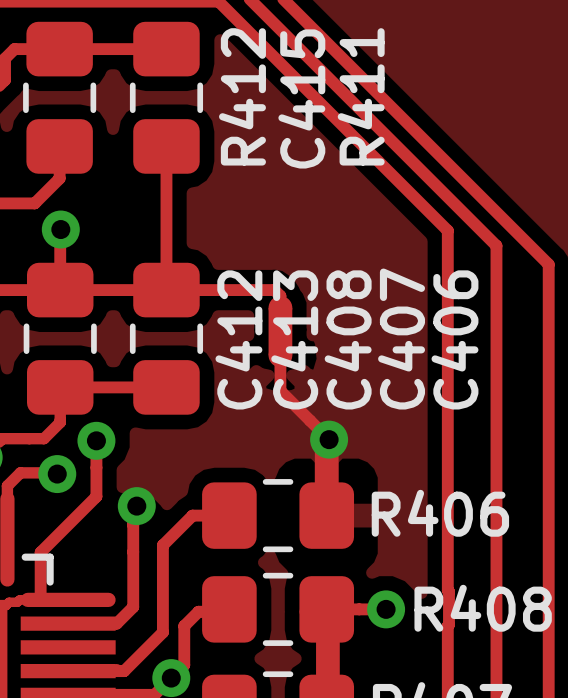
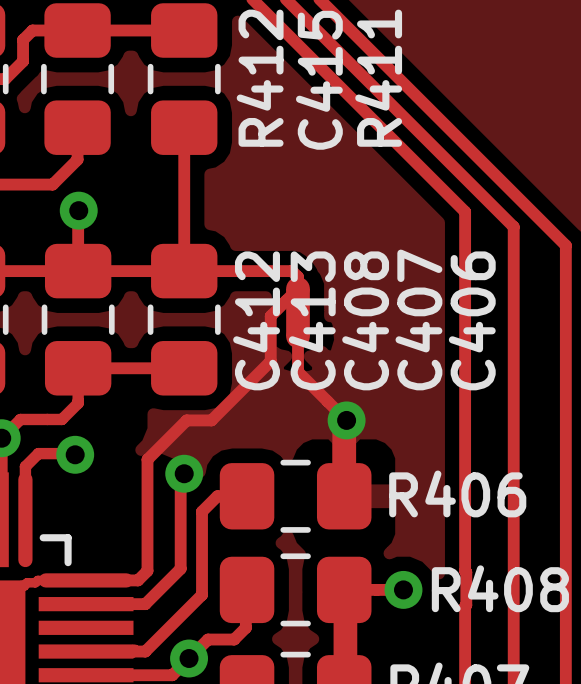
track: none -> (298, 288) (270, 316) (270, 361) (211, 420) (186, 420) (147, 459) (147, 570) (138, 580) (86, 580)
track: (96, 440) (96, 496) (40, 552) (40, 599) -> none
via: (96, 440) -> none
track: (136, 506) (133, 509) (133, 607) (116, 623) -> none
via position: (136, 506) -> (184, 473)
track: (199, 515) (192, 515) (162, 545) -> (184, 473) (180, 477) (180, 525)
track: none -> (217, 496) (202, 511) (202, 594) (145, 651) (142, 651)
track: (162, 588) (162, 632) (124, 671) -> (180, 568) (145, 604) (134, 604)
track: (208, 611) (198, 611) (184, 626) (184, 665) -> (247, 589) (245, 627) (234, 639) (208, 639) (202, 645)

